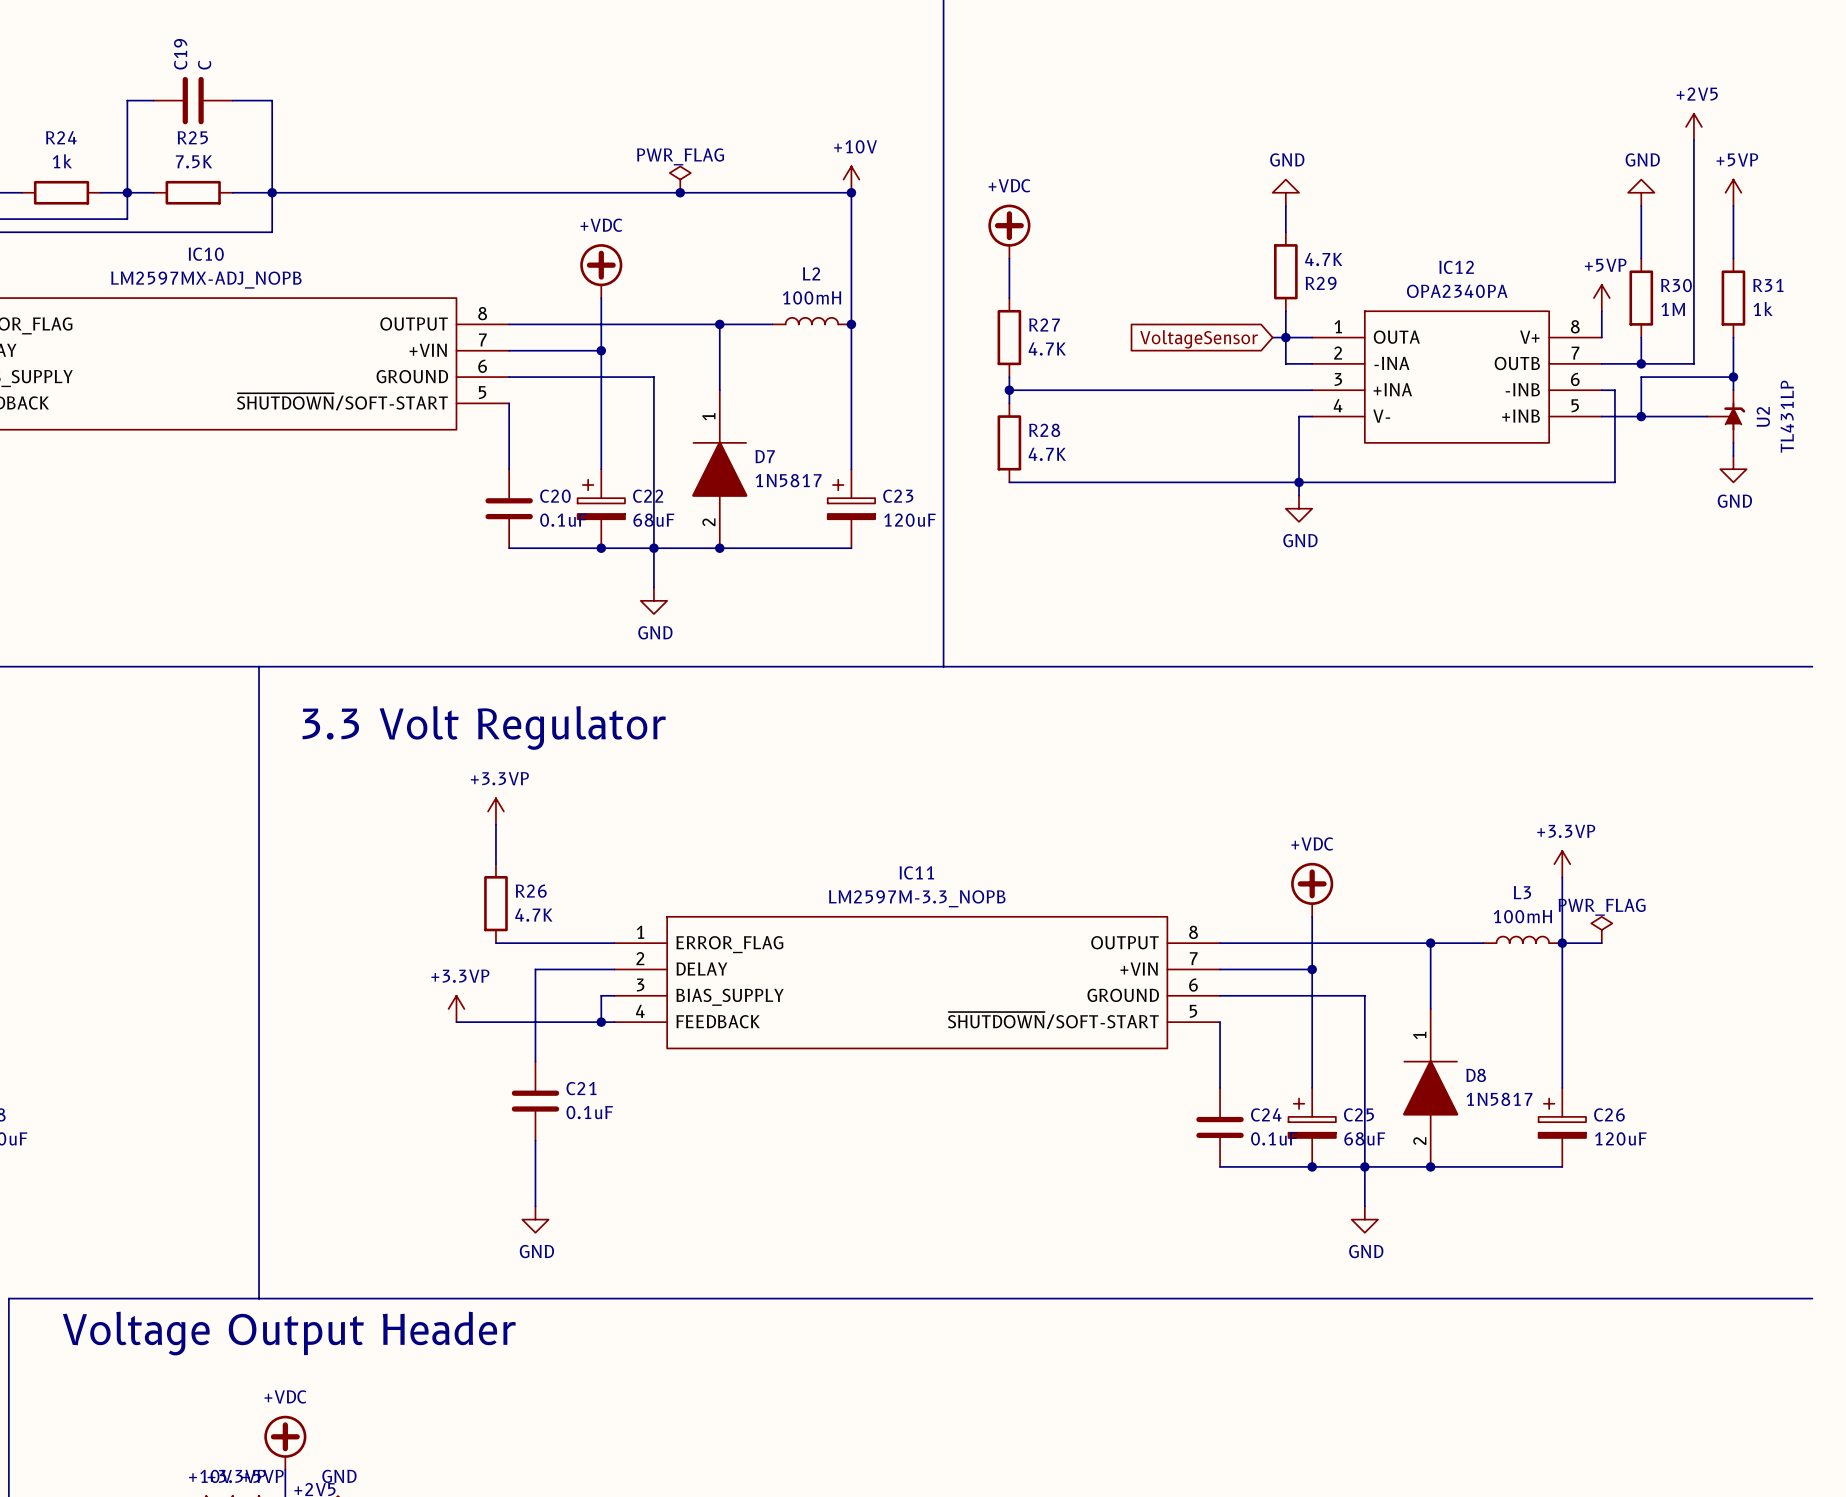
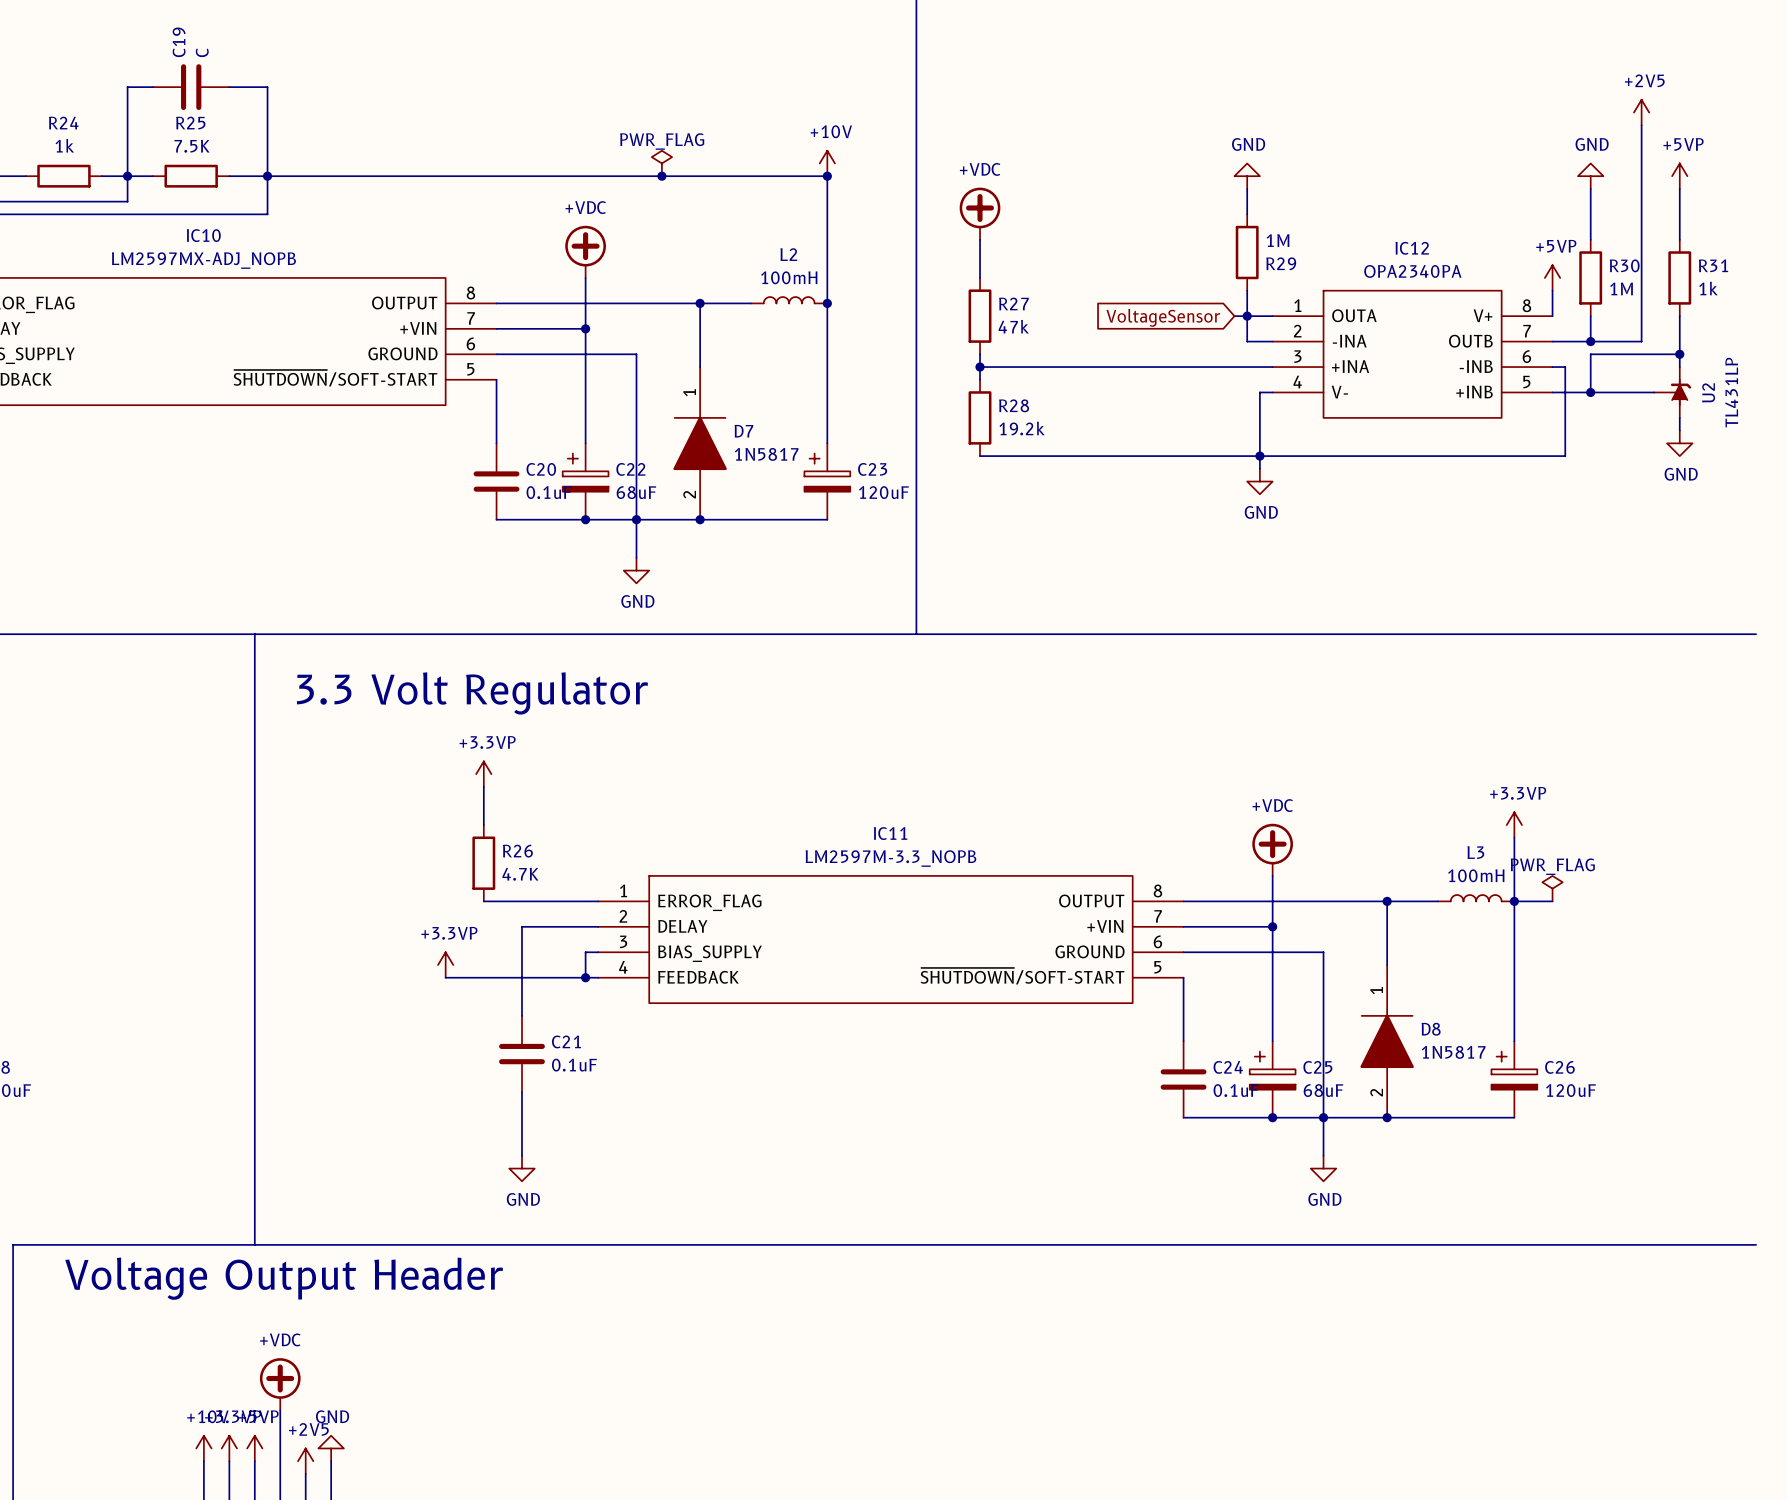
R29 value: 4.7K (1323, 259) -> 1M (1278, 240)
R27 value: 4.7K (1047, 349) -> 47k (1013, 326)
R28 value: 4.7K (1047, 454) -> 19.2k (1022, 428)

